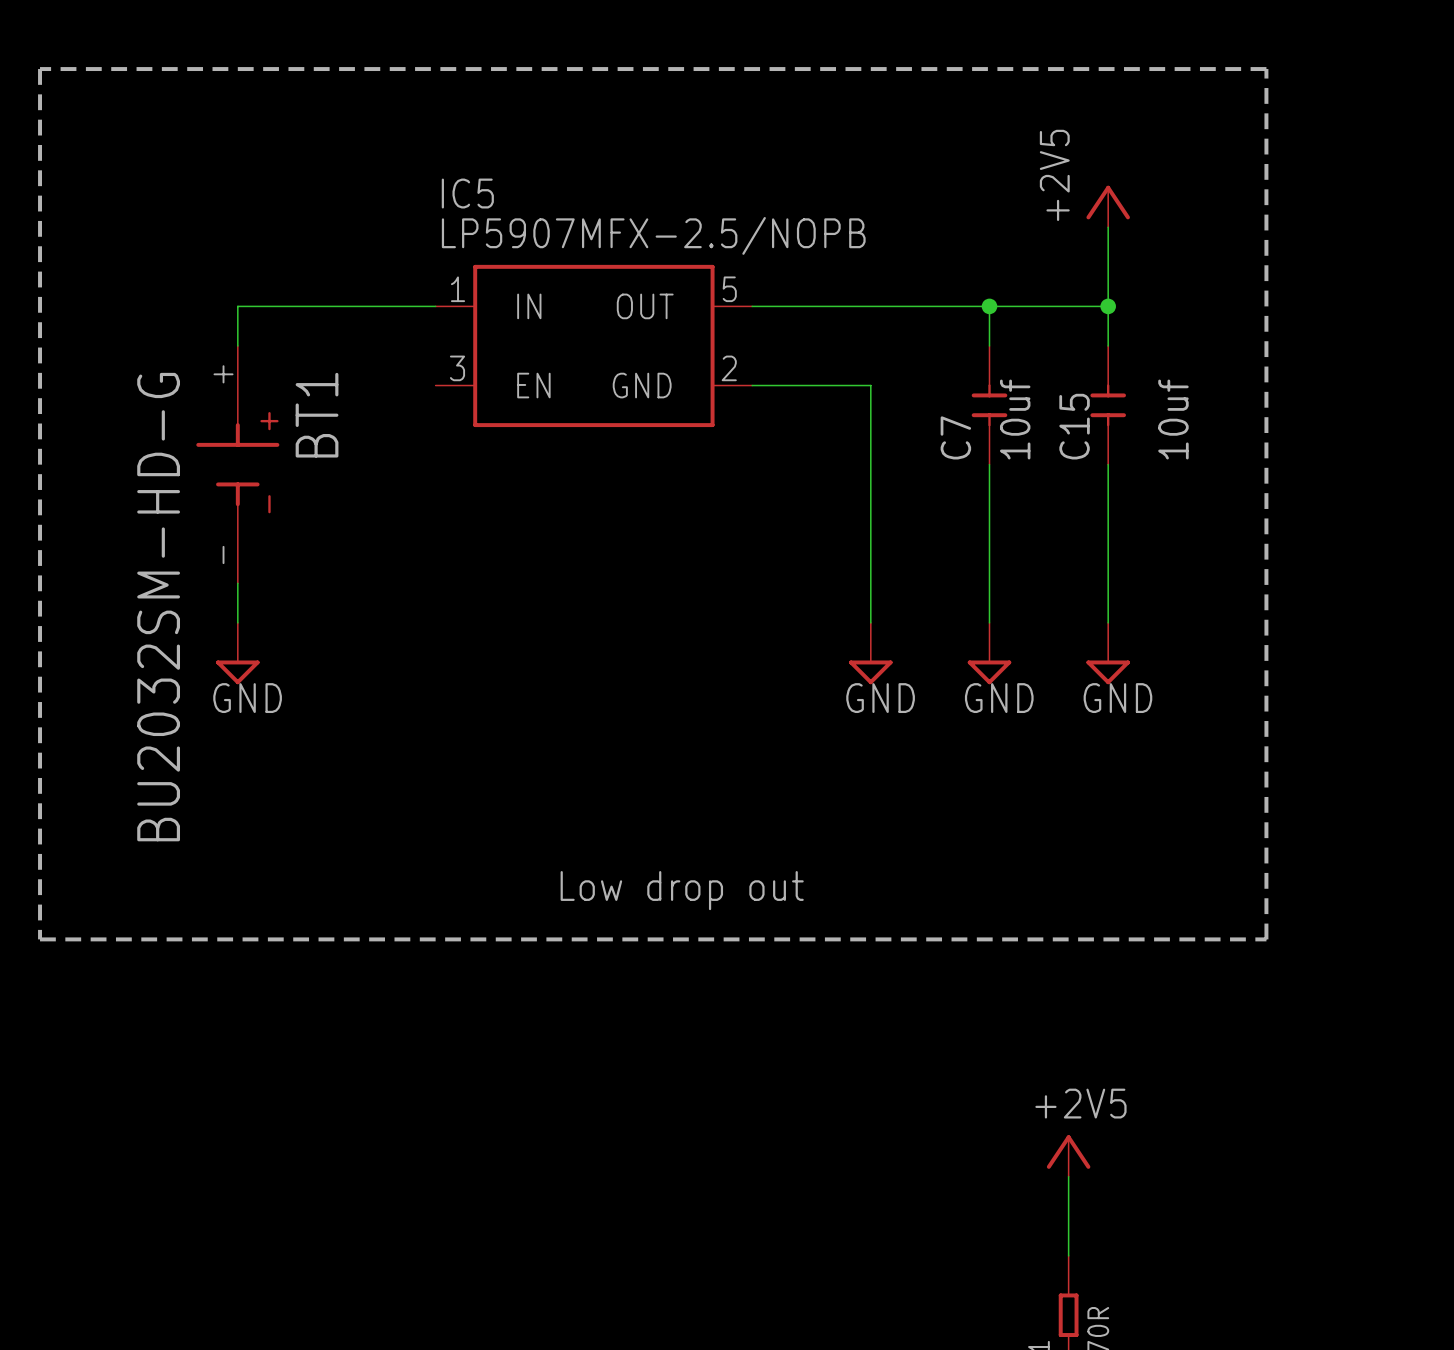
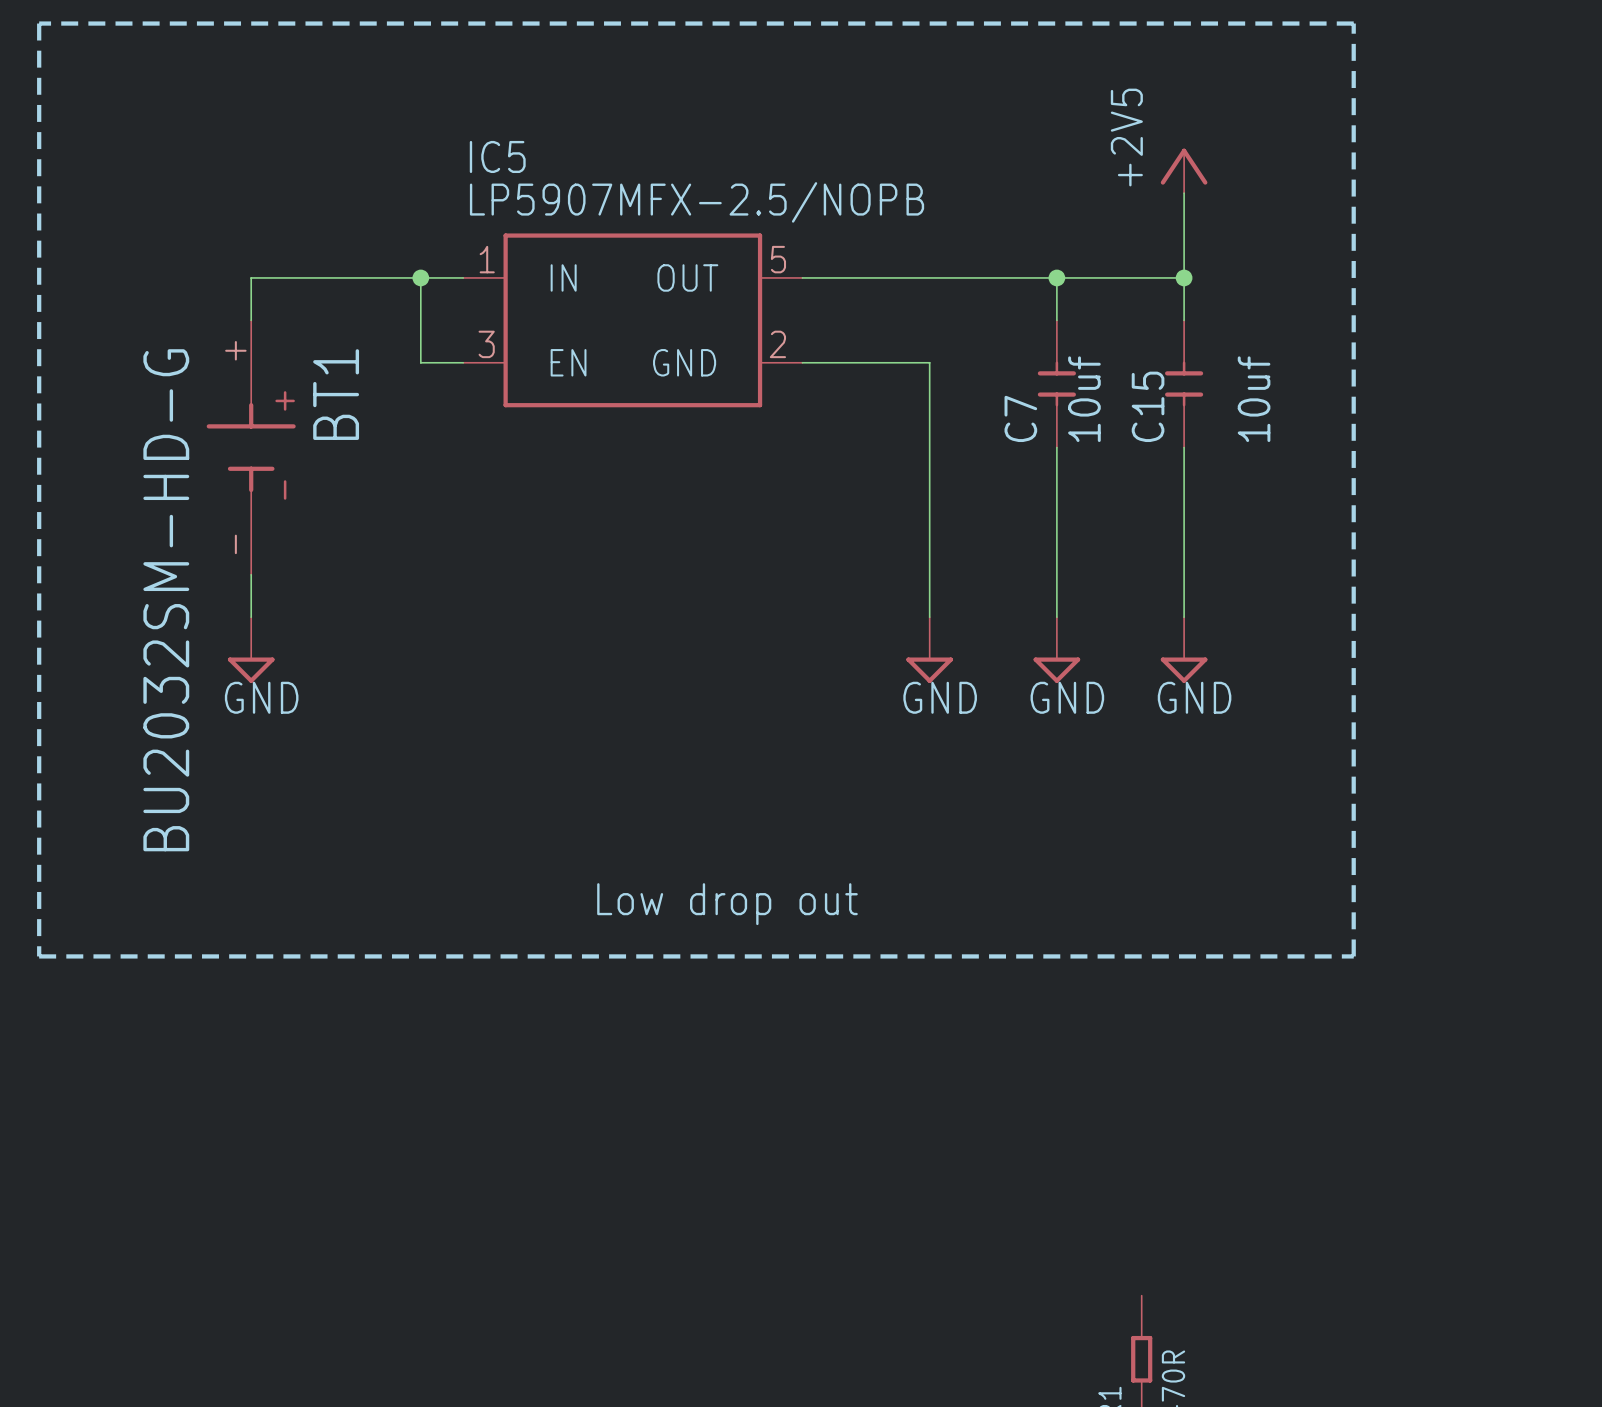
wire: none -> (420, 277) (420, 362) (463, 362)
junction: none -> (420, 277)
power symbol: +2V5 (1068, 1156) -> none
wire: (1068, 1176) (1068, 1255) -> none

